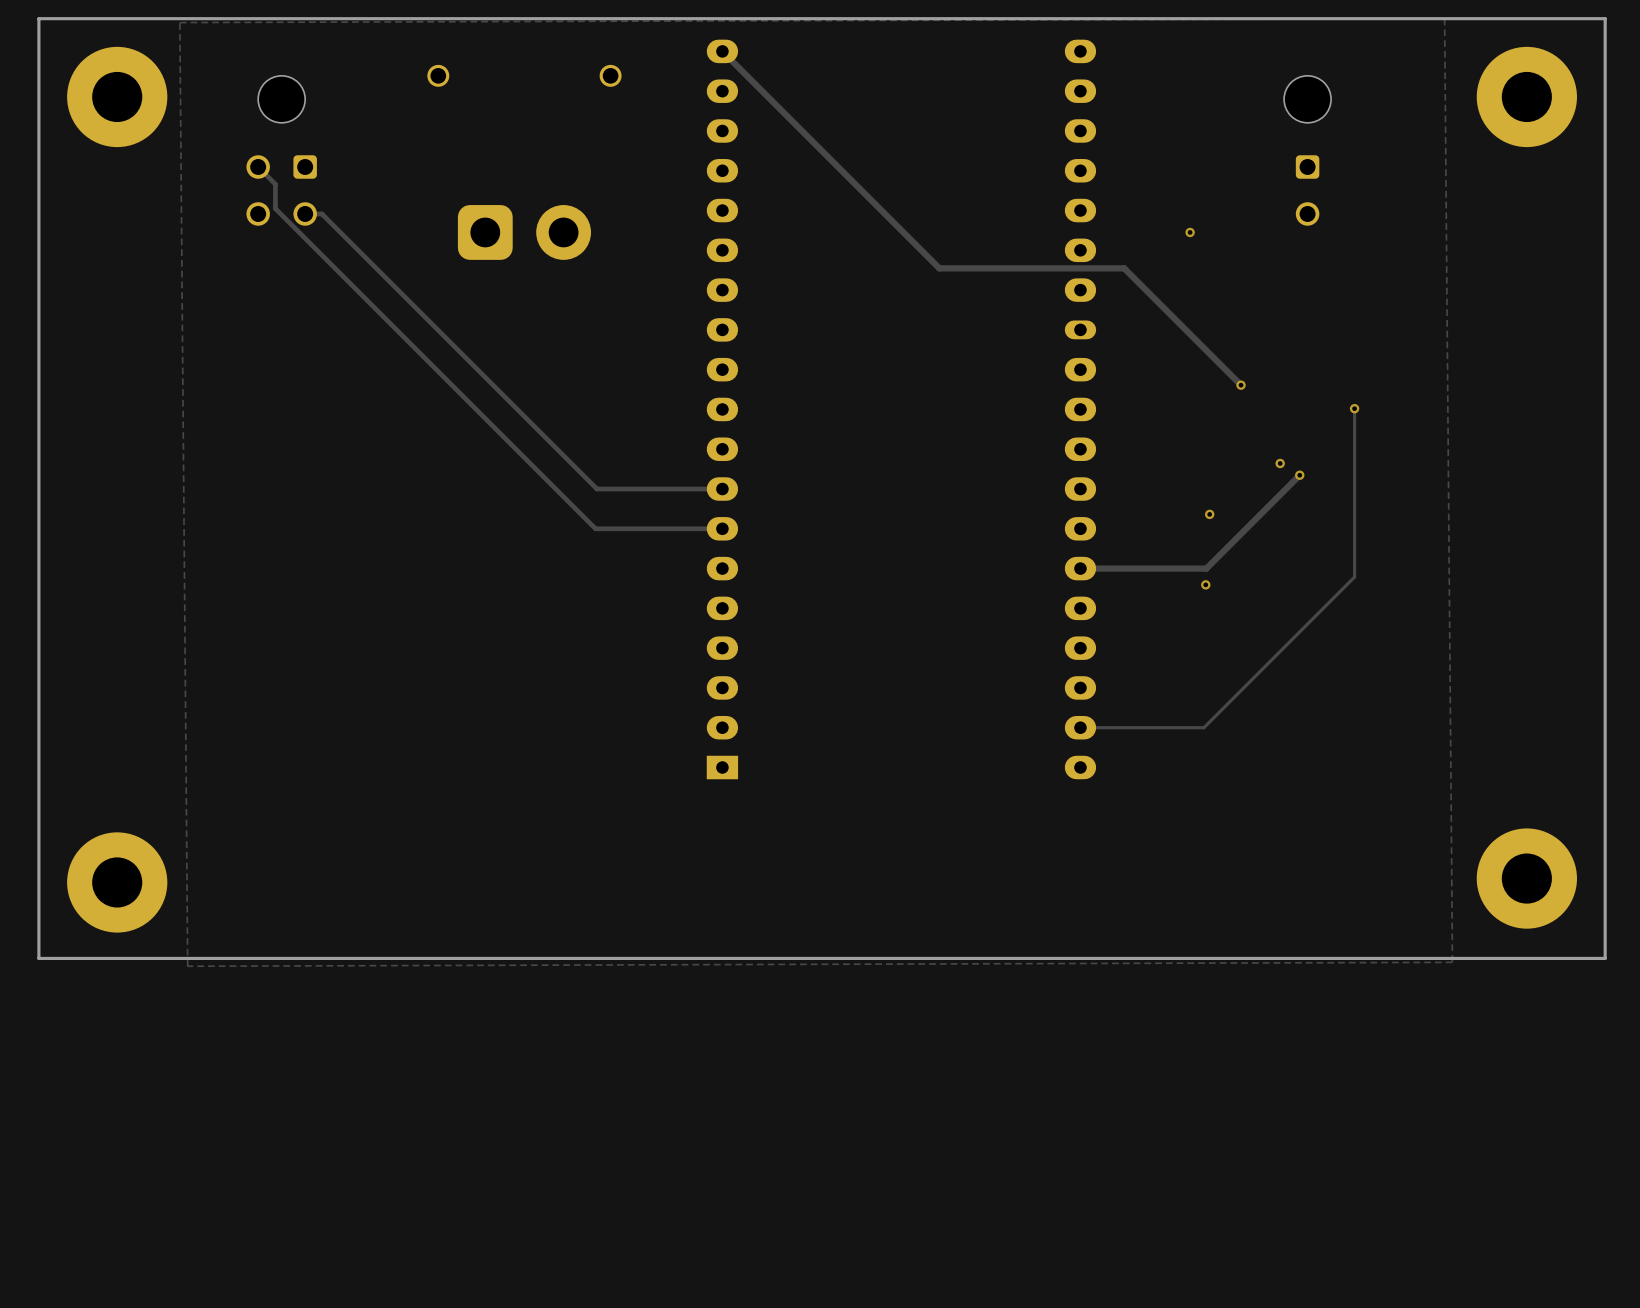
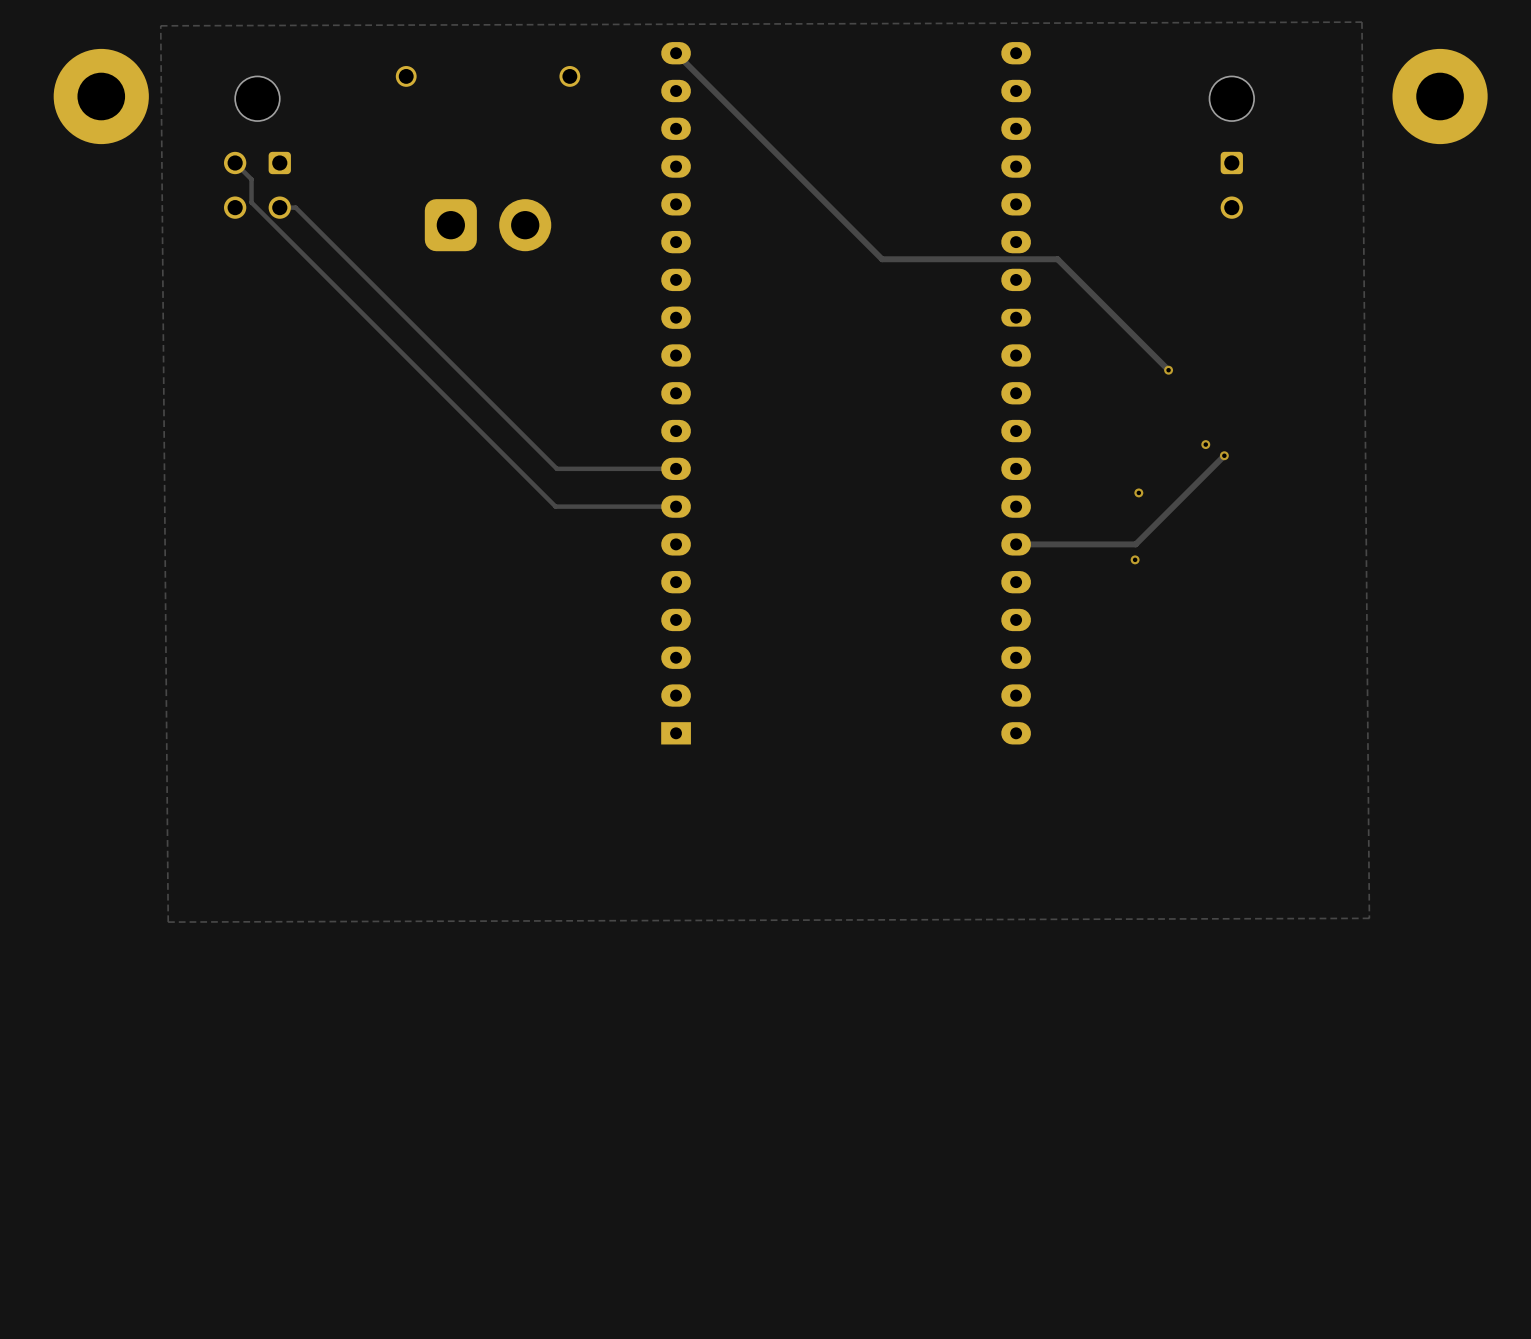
board edge: (1605, 18) (38, 18) (38, 958) (1605, 958) (1605, 18) -> none
via: (1190, 232) -> none
track: (1354, 408) (1354, 577) (1203, 727) (1080, 727) -> none
via: (1354, 408) -> none
part: (1526, 878) -> none
part: (117, 882) -> none

